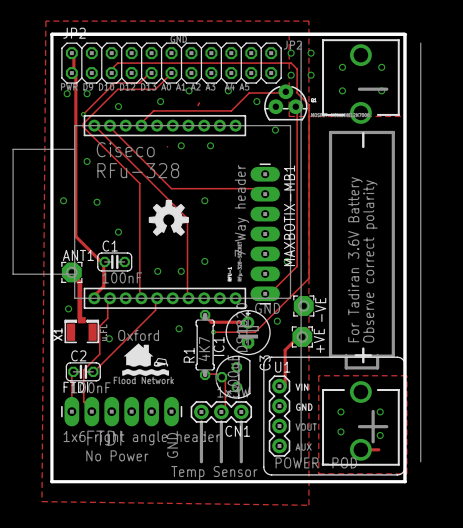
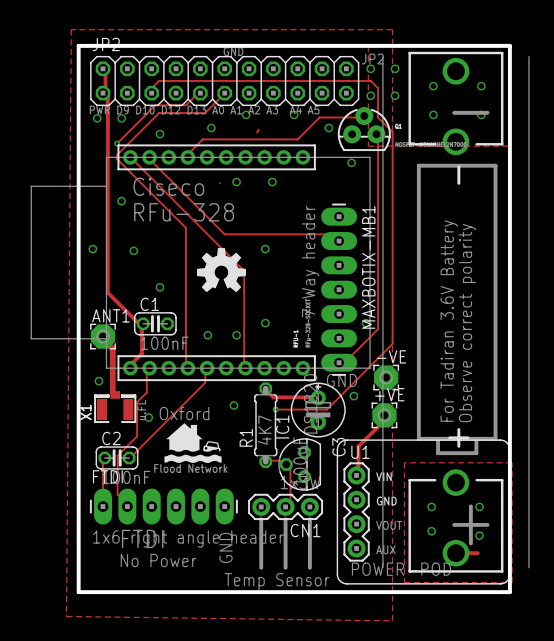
-VE name rotation: 0° (320, 309) -> 90° clockwise (391, 356)
track: (302, 336) (297, 338) (285, 350) (285, 386) (279, 386) -> none
+VE name rotation: 0° (319, 340) -> 90° clockwise (389, 394)
track: none -> (384, 421) (358, 446) (358, 465) (356, 469)

